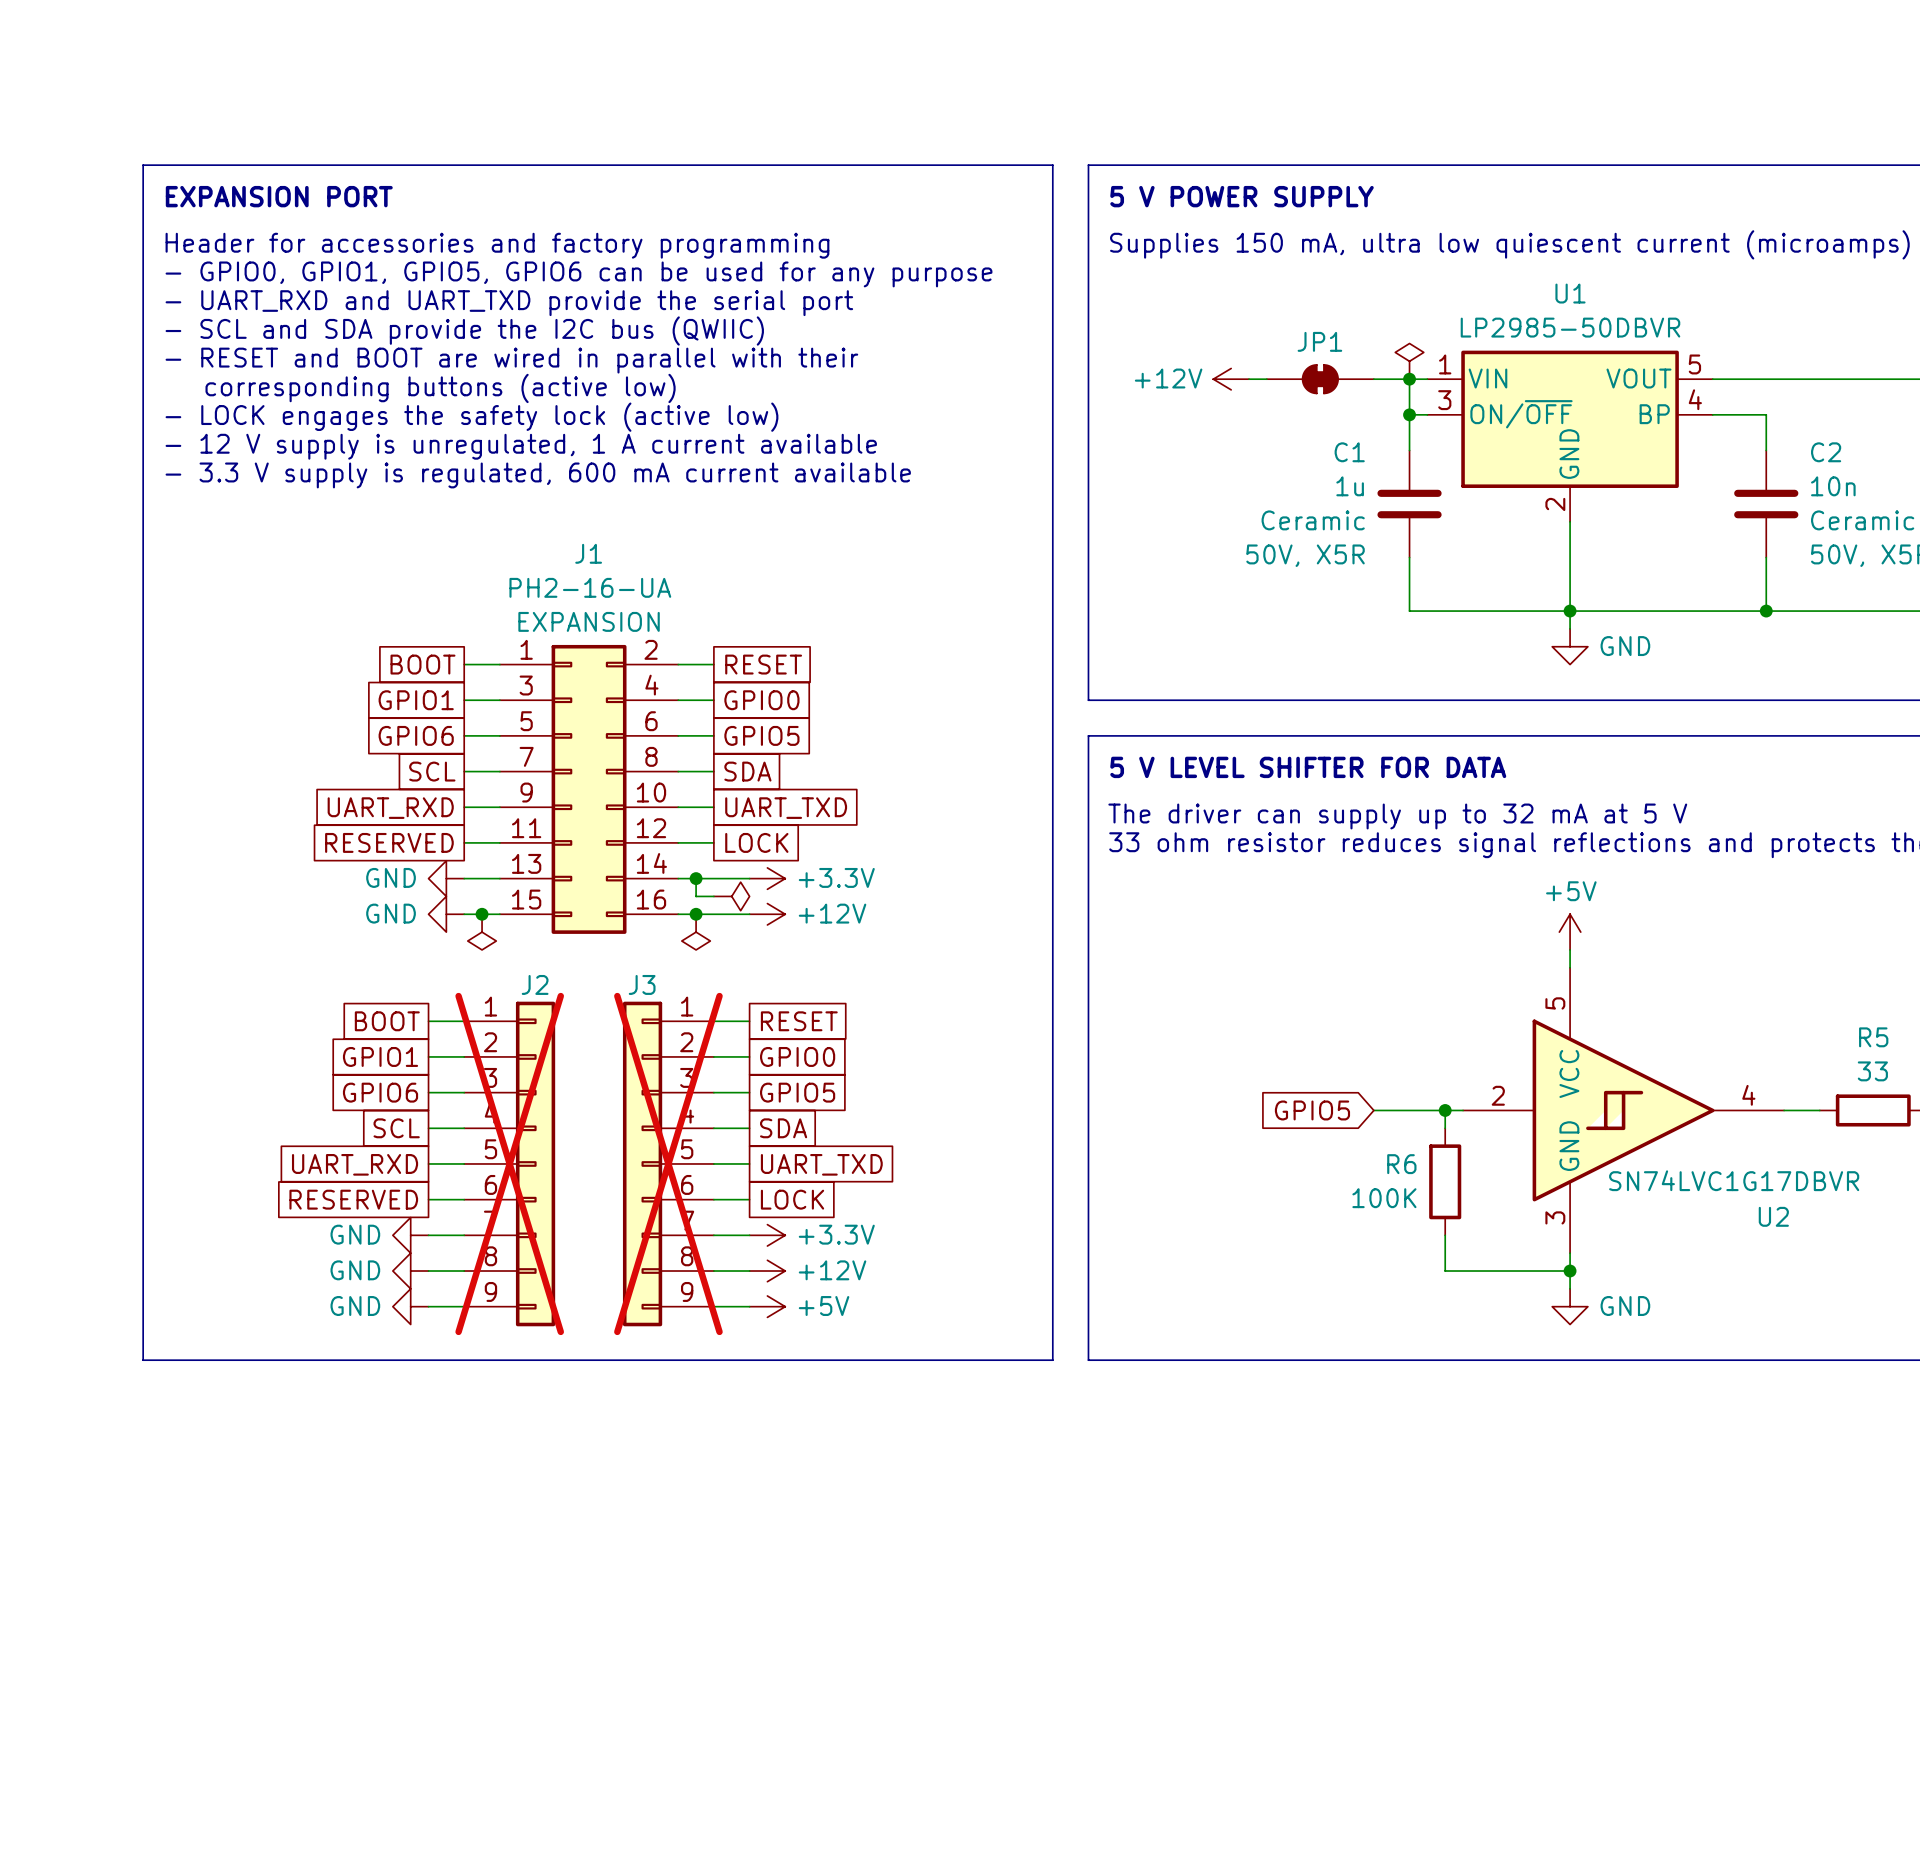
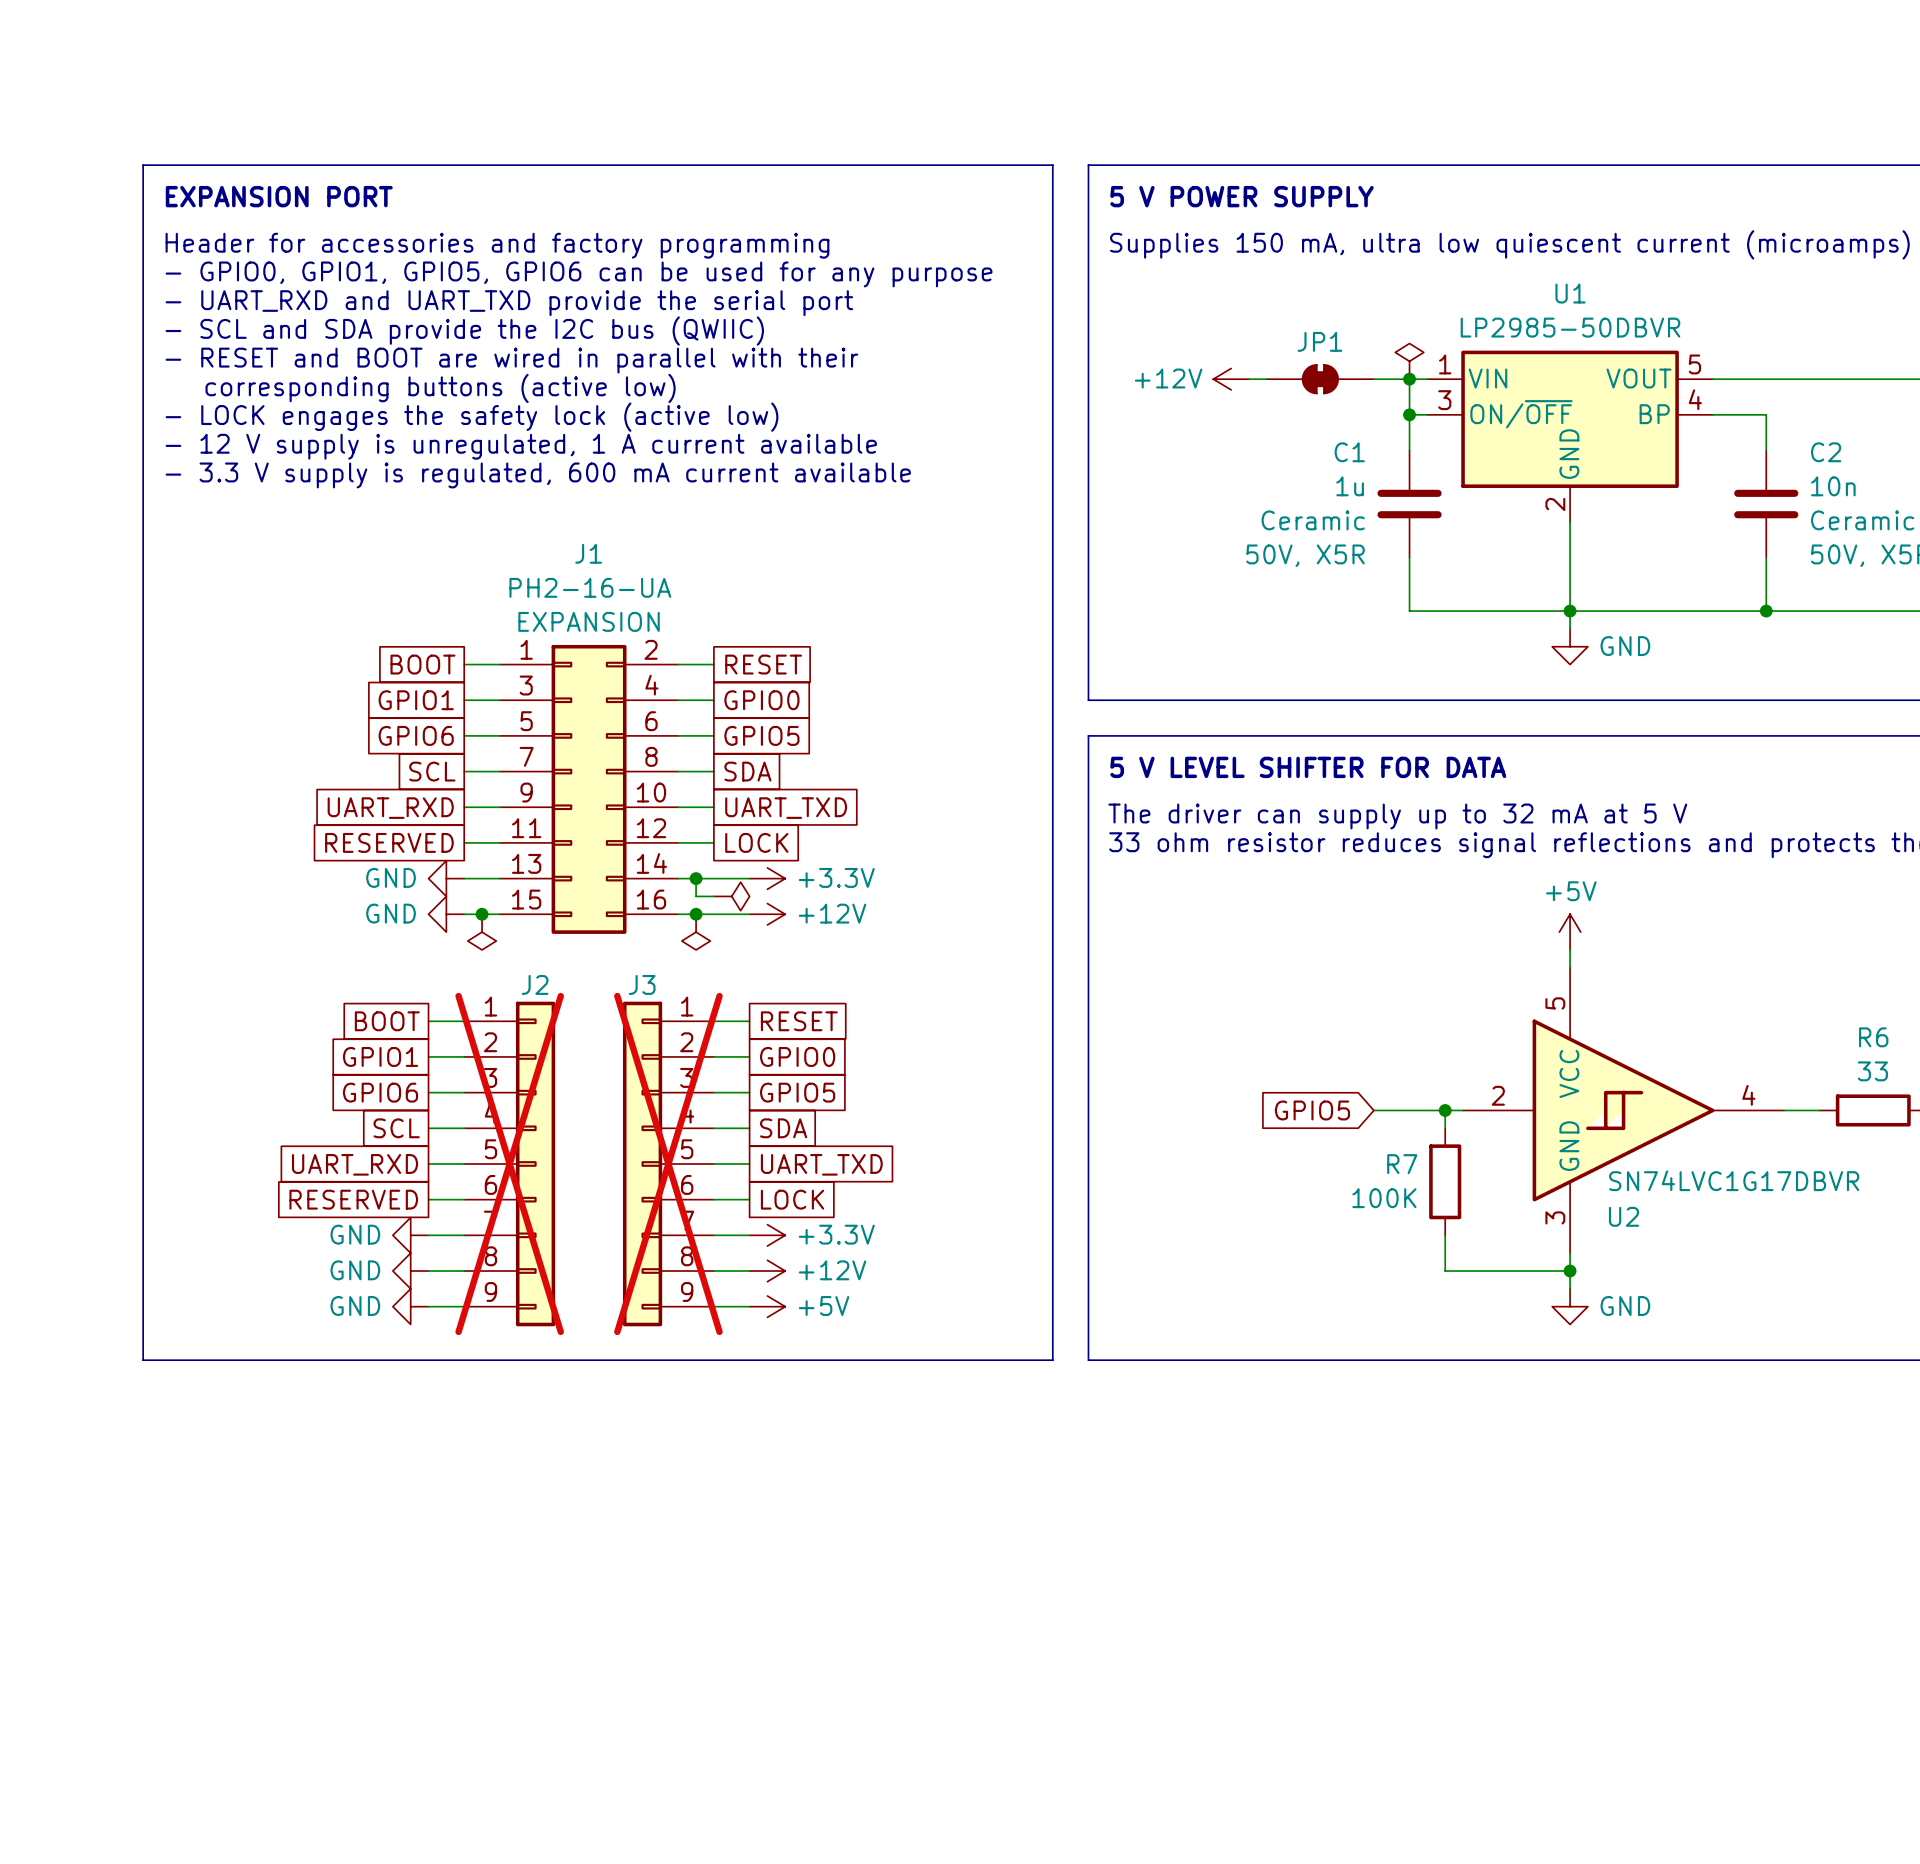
R5 name: R5 (1873, 1037) -> R6 (1873, 1037)
R6 name: R6 (1401, 1164) -> R7 (1402, 1164)
U2 name position: U2 (1773, 1216) -> U2 (1624, 1216)

